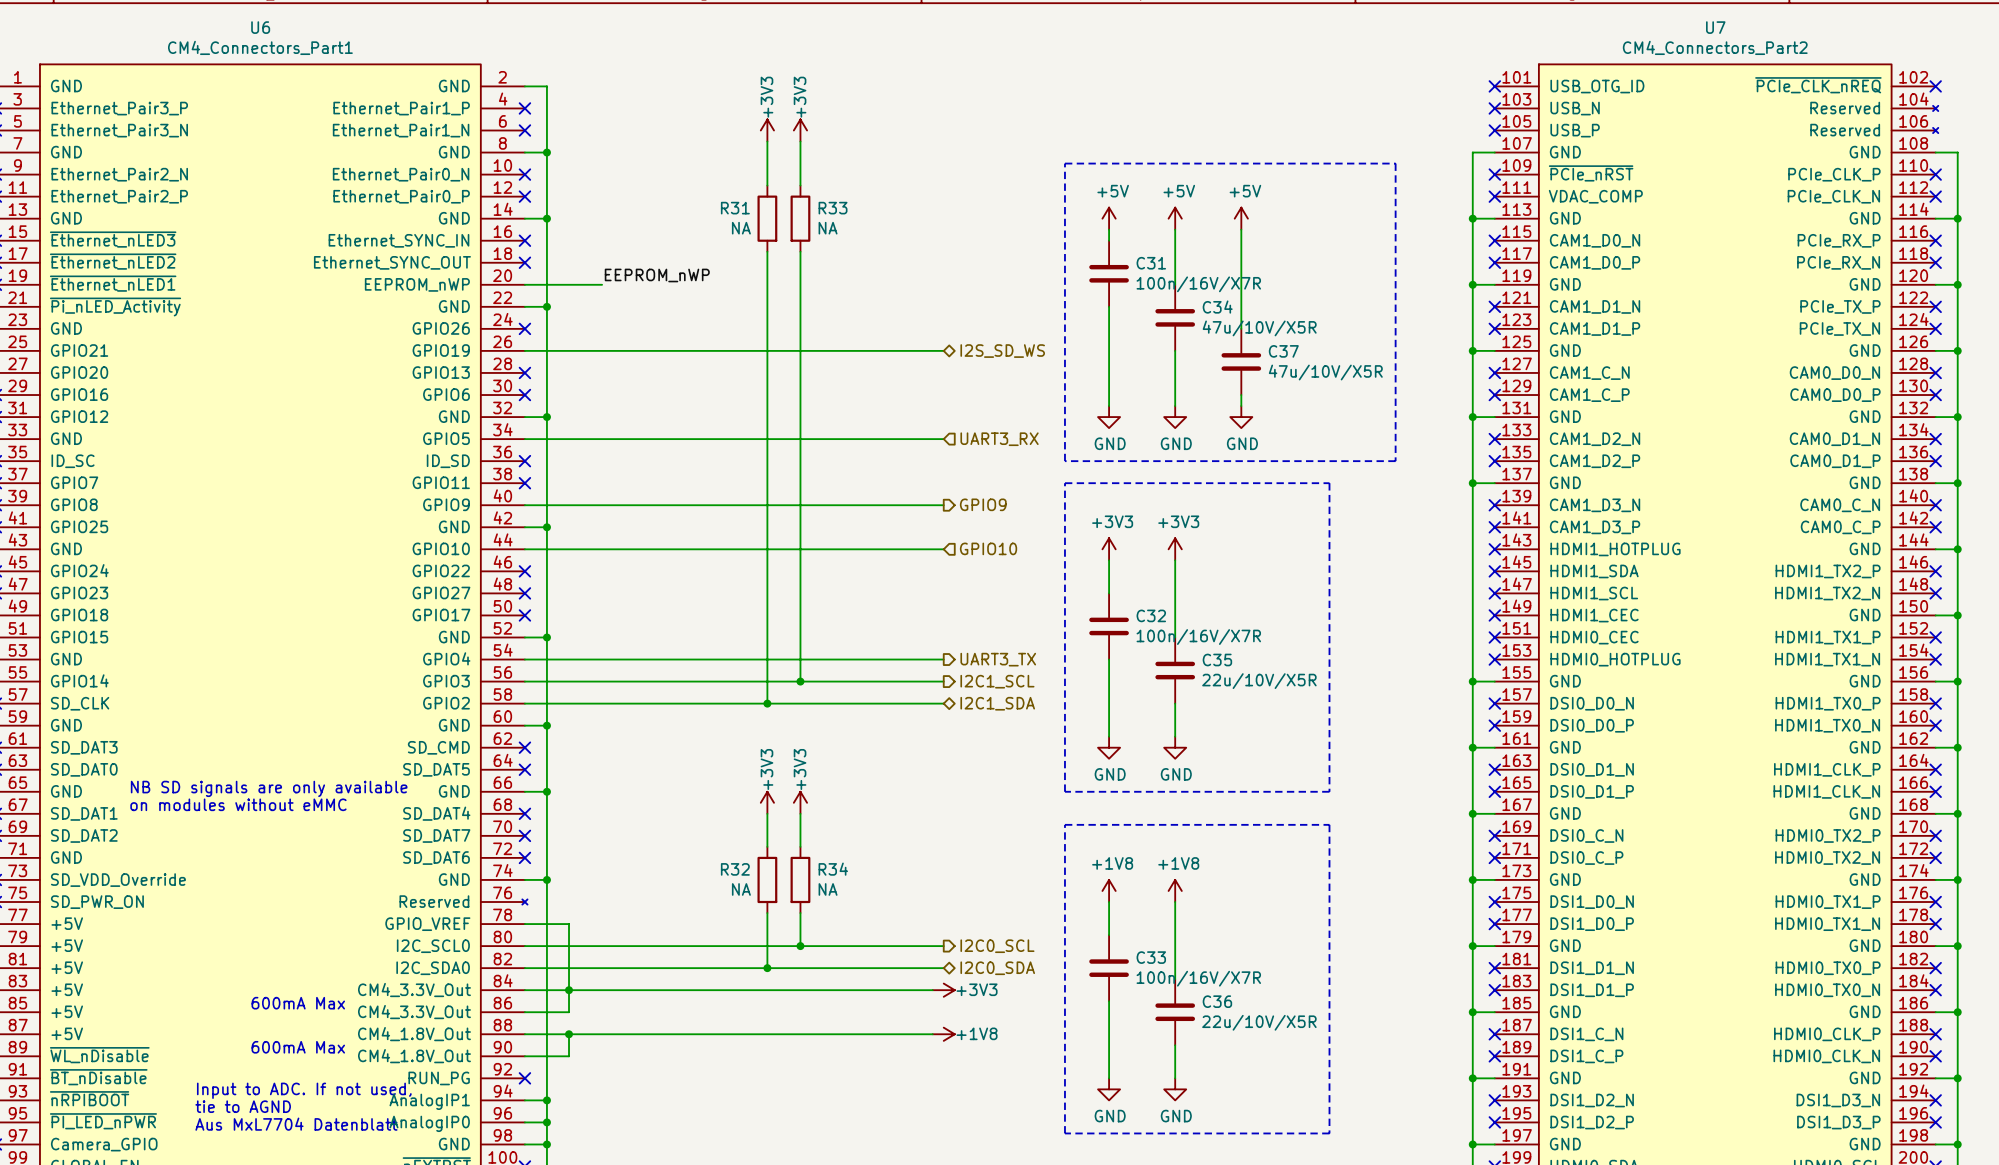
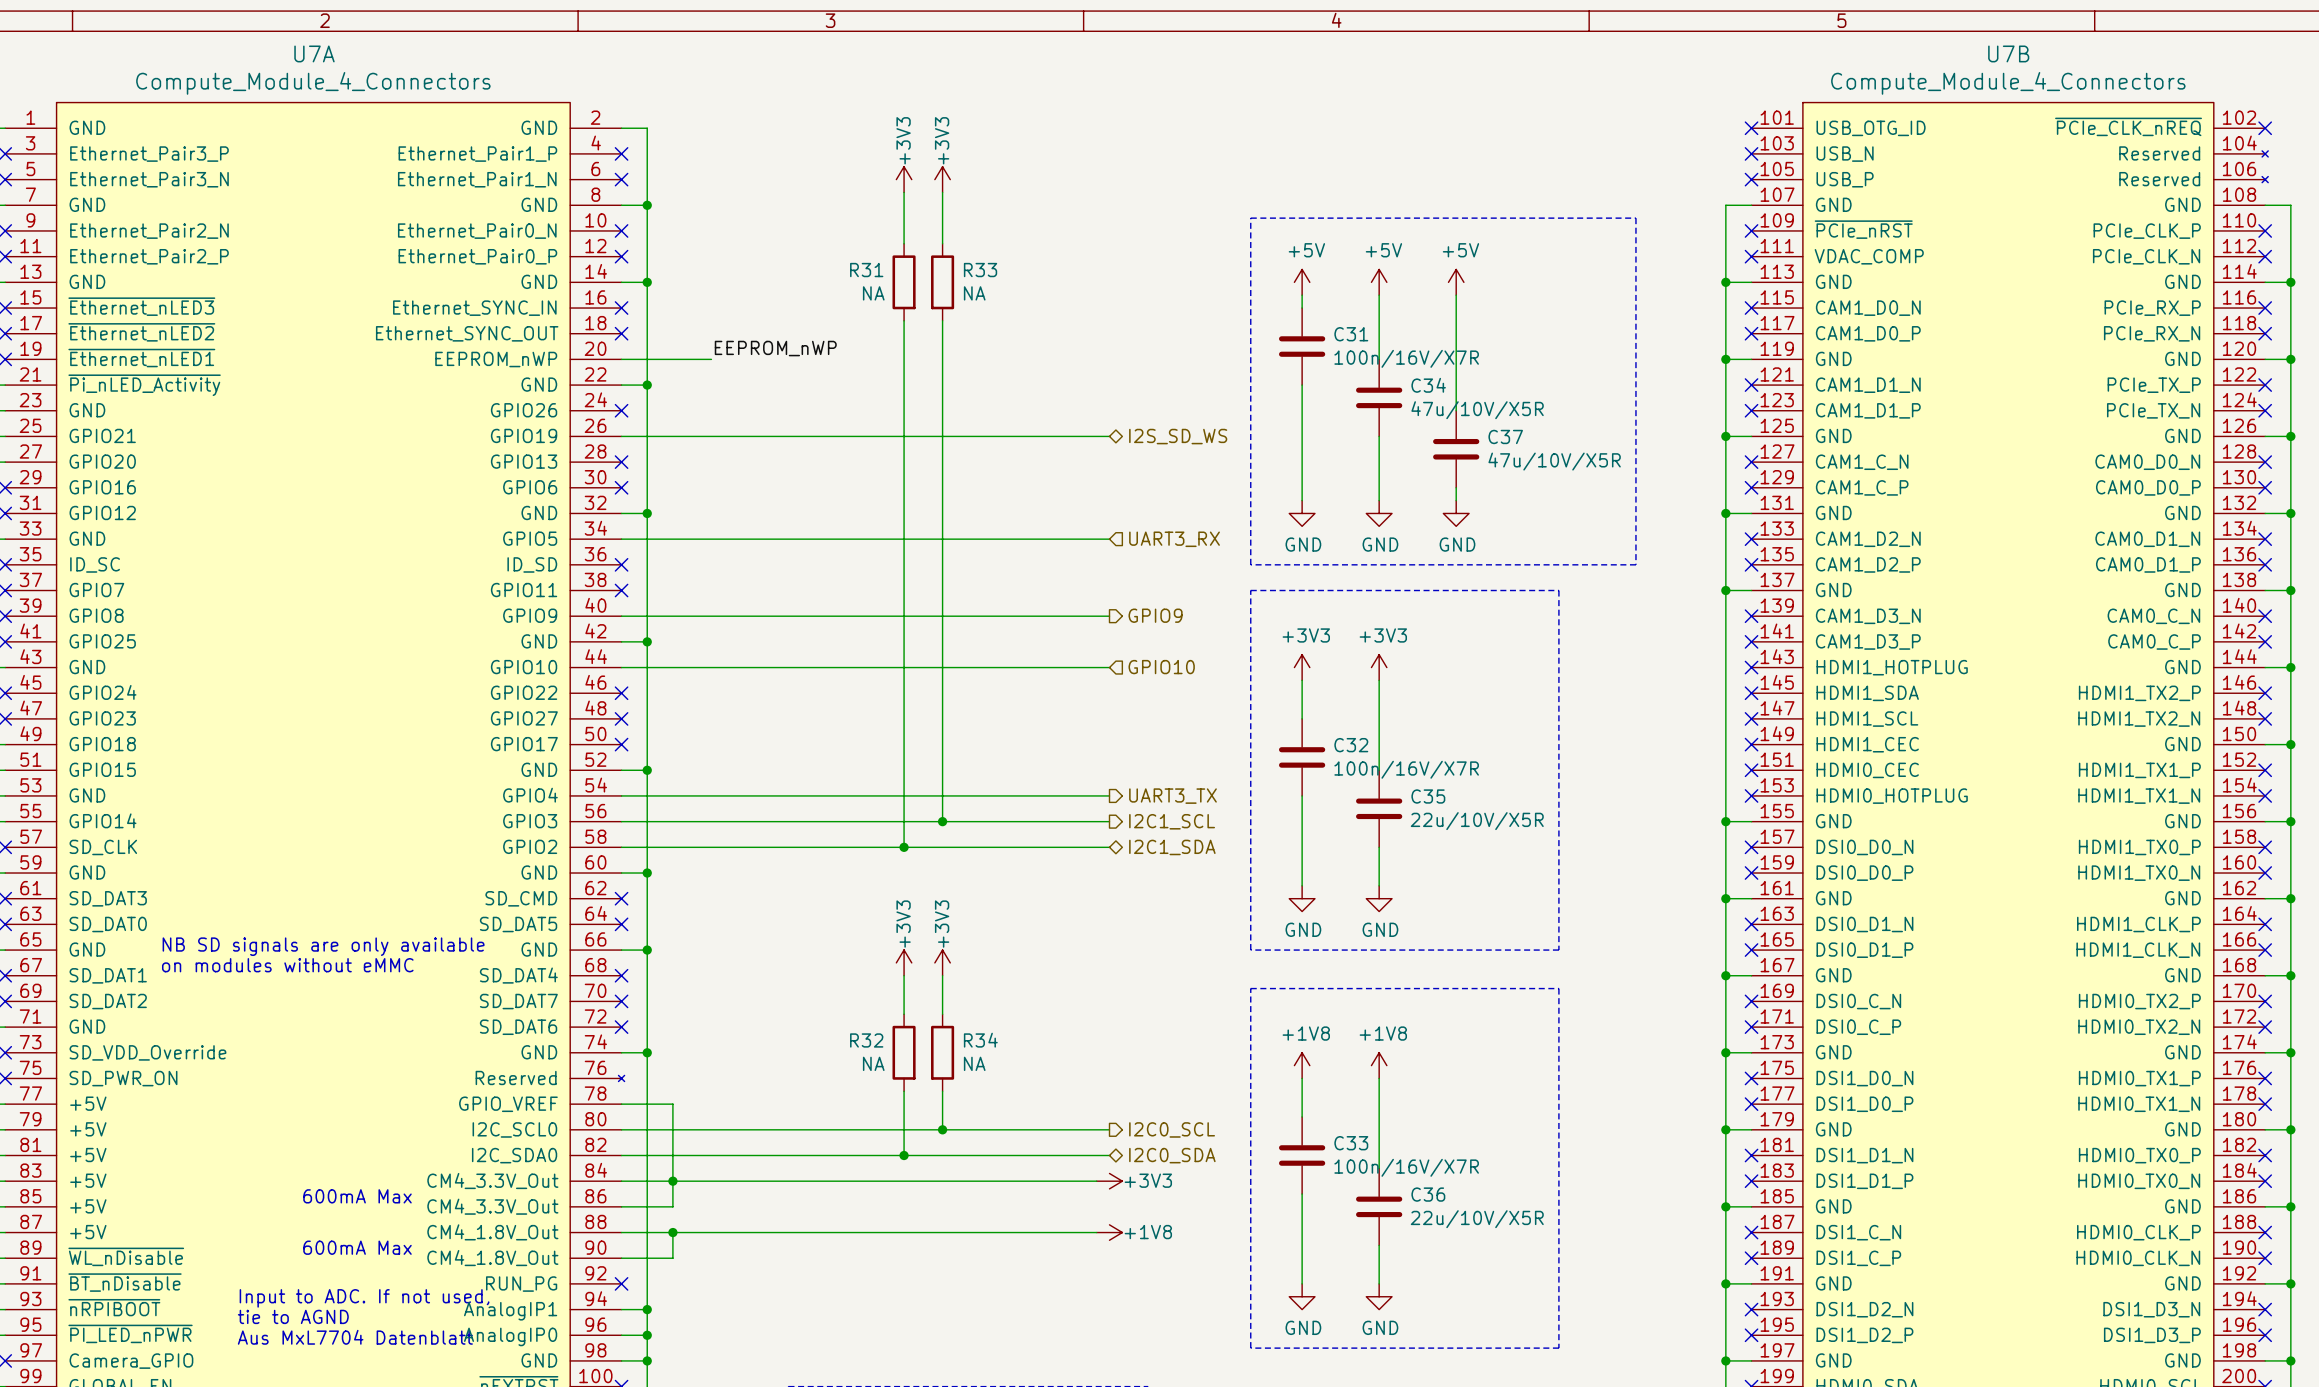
U6 name: U6 (260, 27) -> U7A (314, 53)
U7 name: U7 (1715, 27) -> U7B (2008, 53)
U6 value: CM4_Connectors_Part1 (260, 47) -> Compute_Module_4_Connectors (313, 83)
U7 value: CM4_Connectors_Part2 (1715, 47) -> Compute_Module_4_Connectors (2008, 83)

